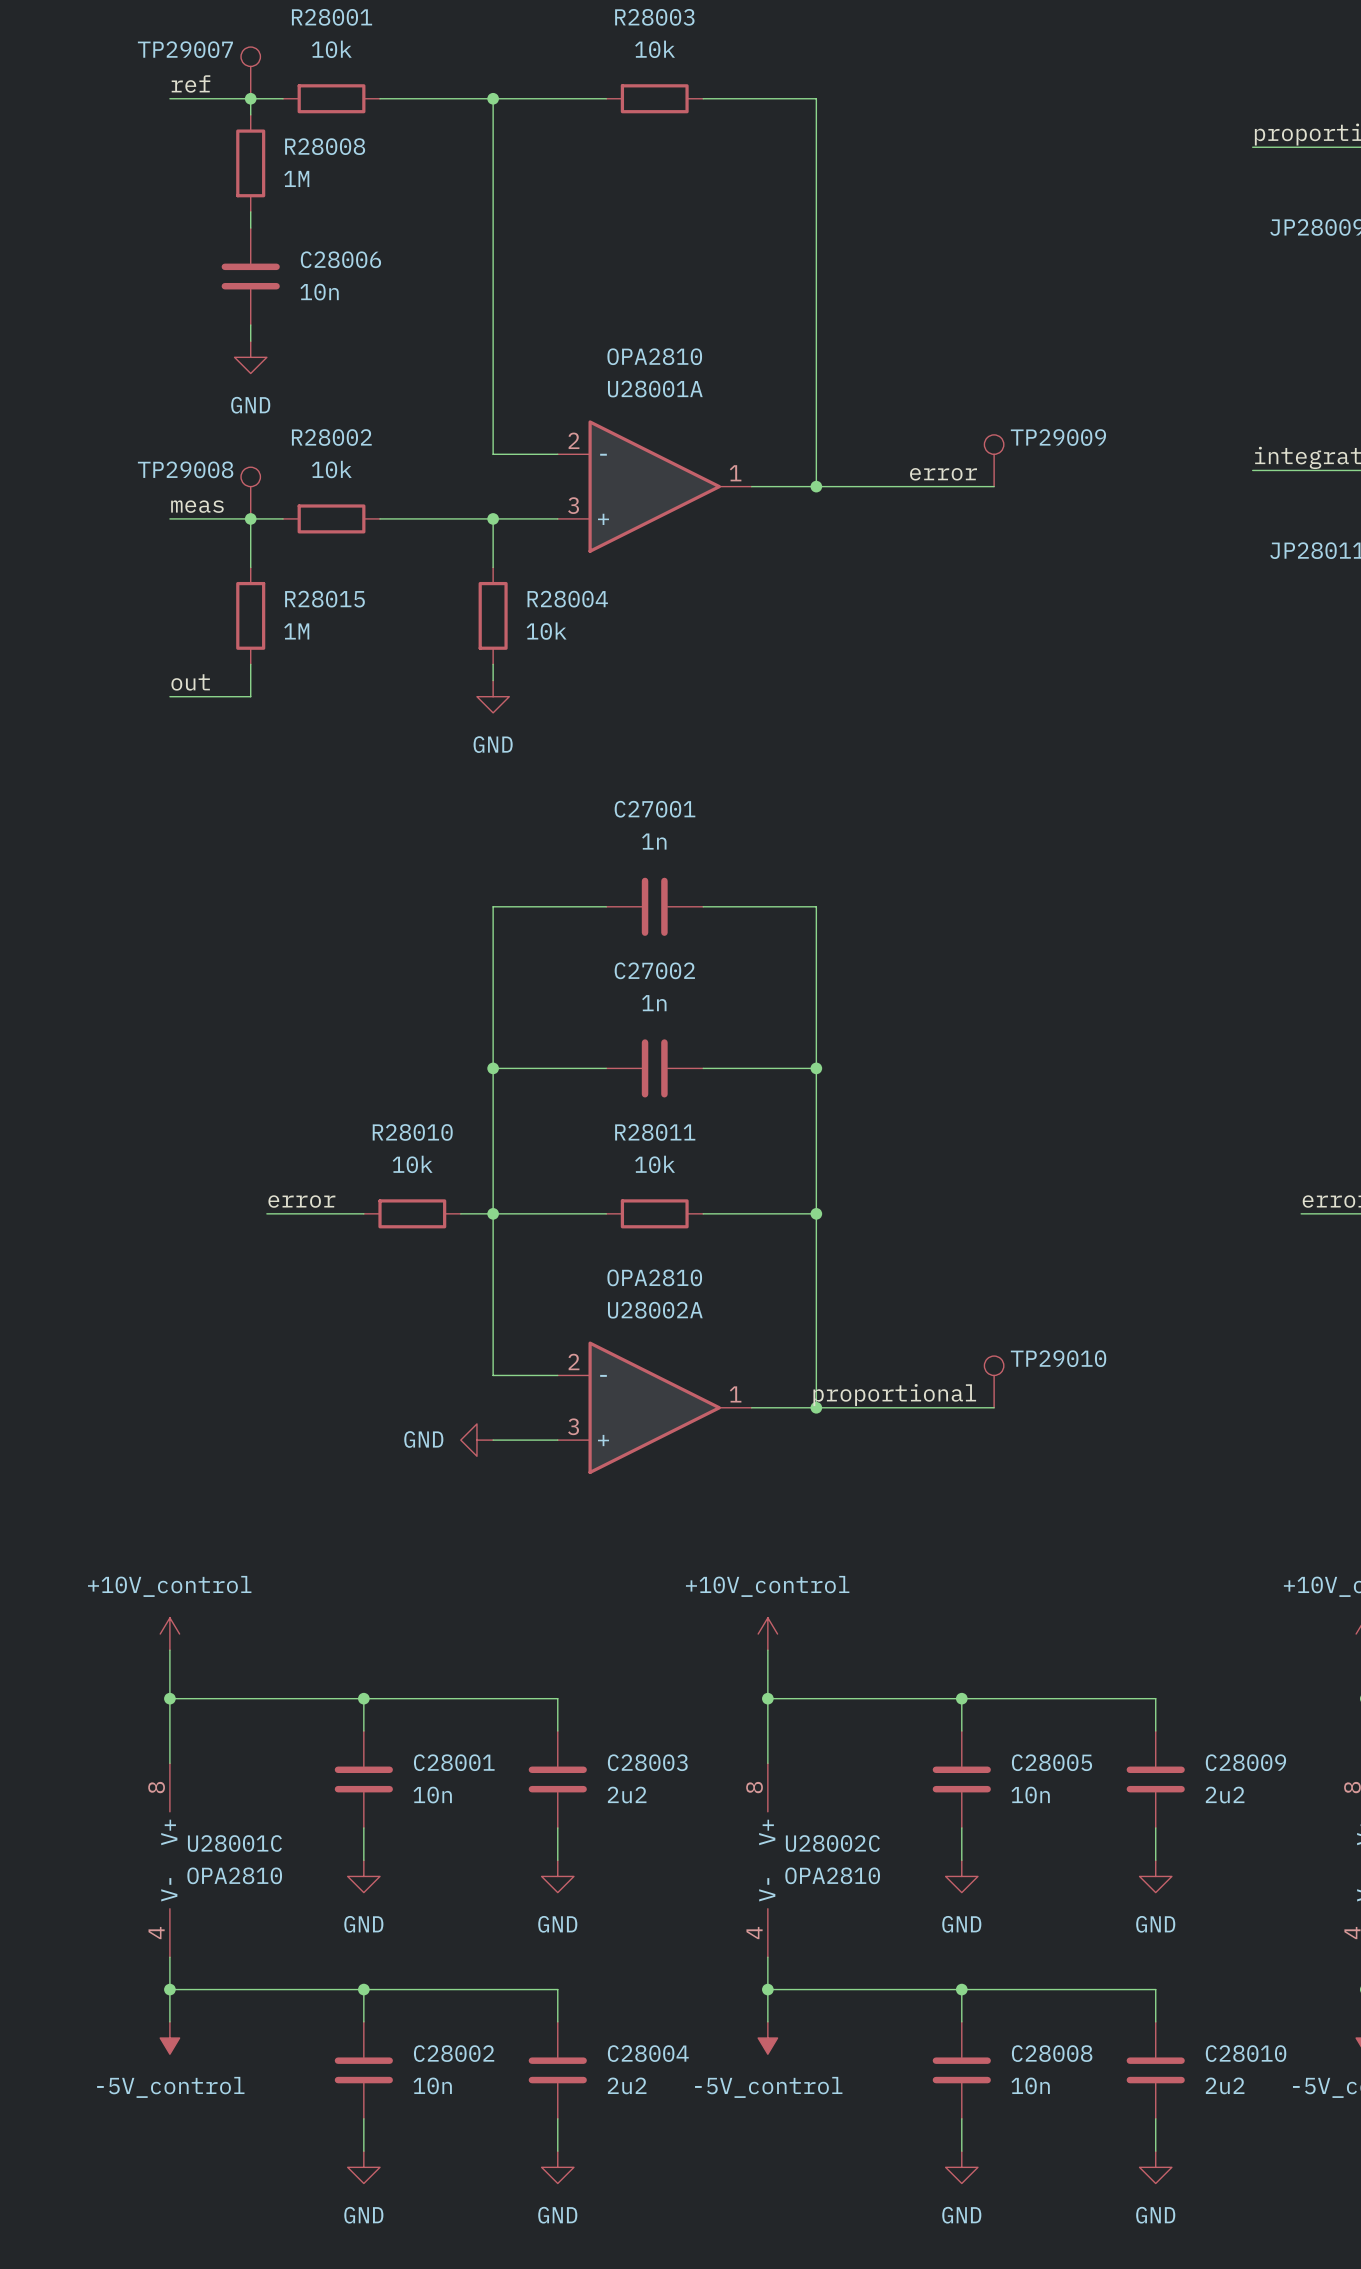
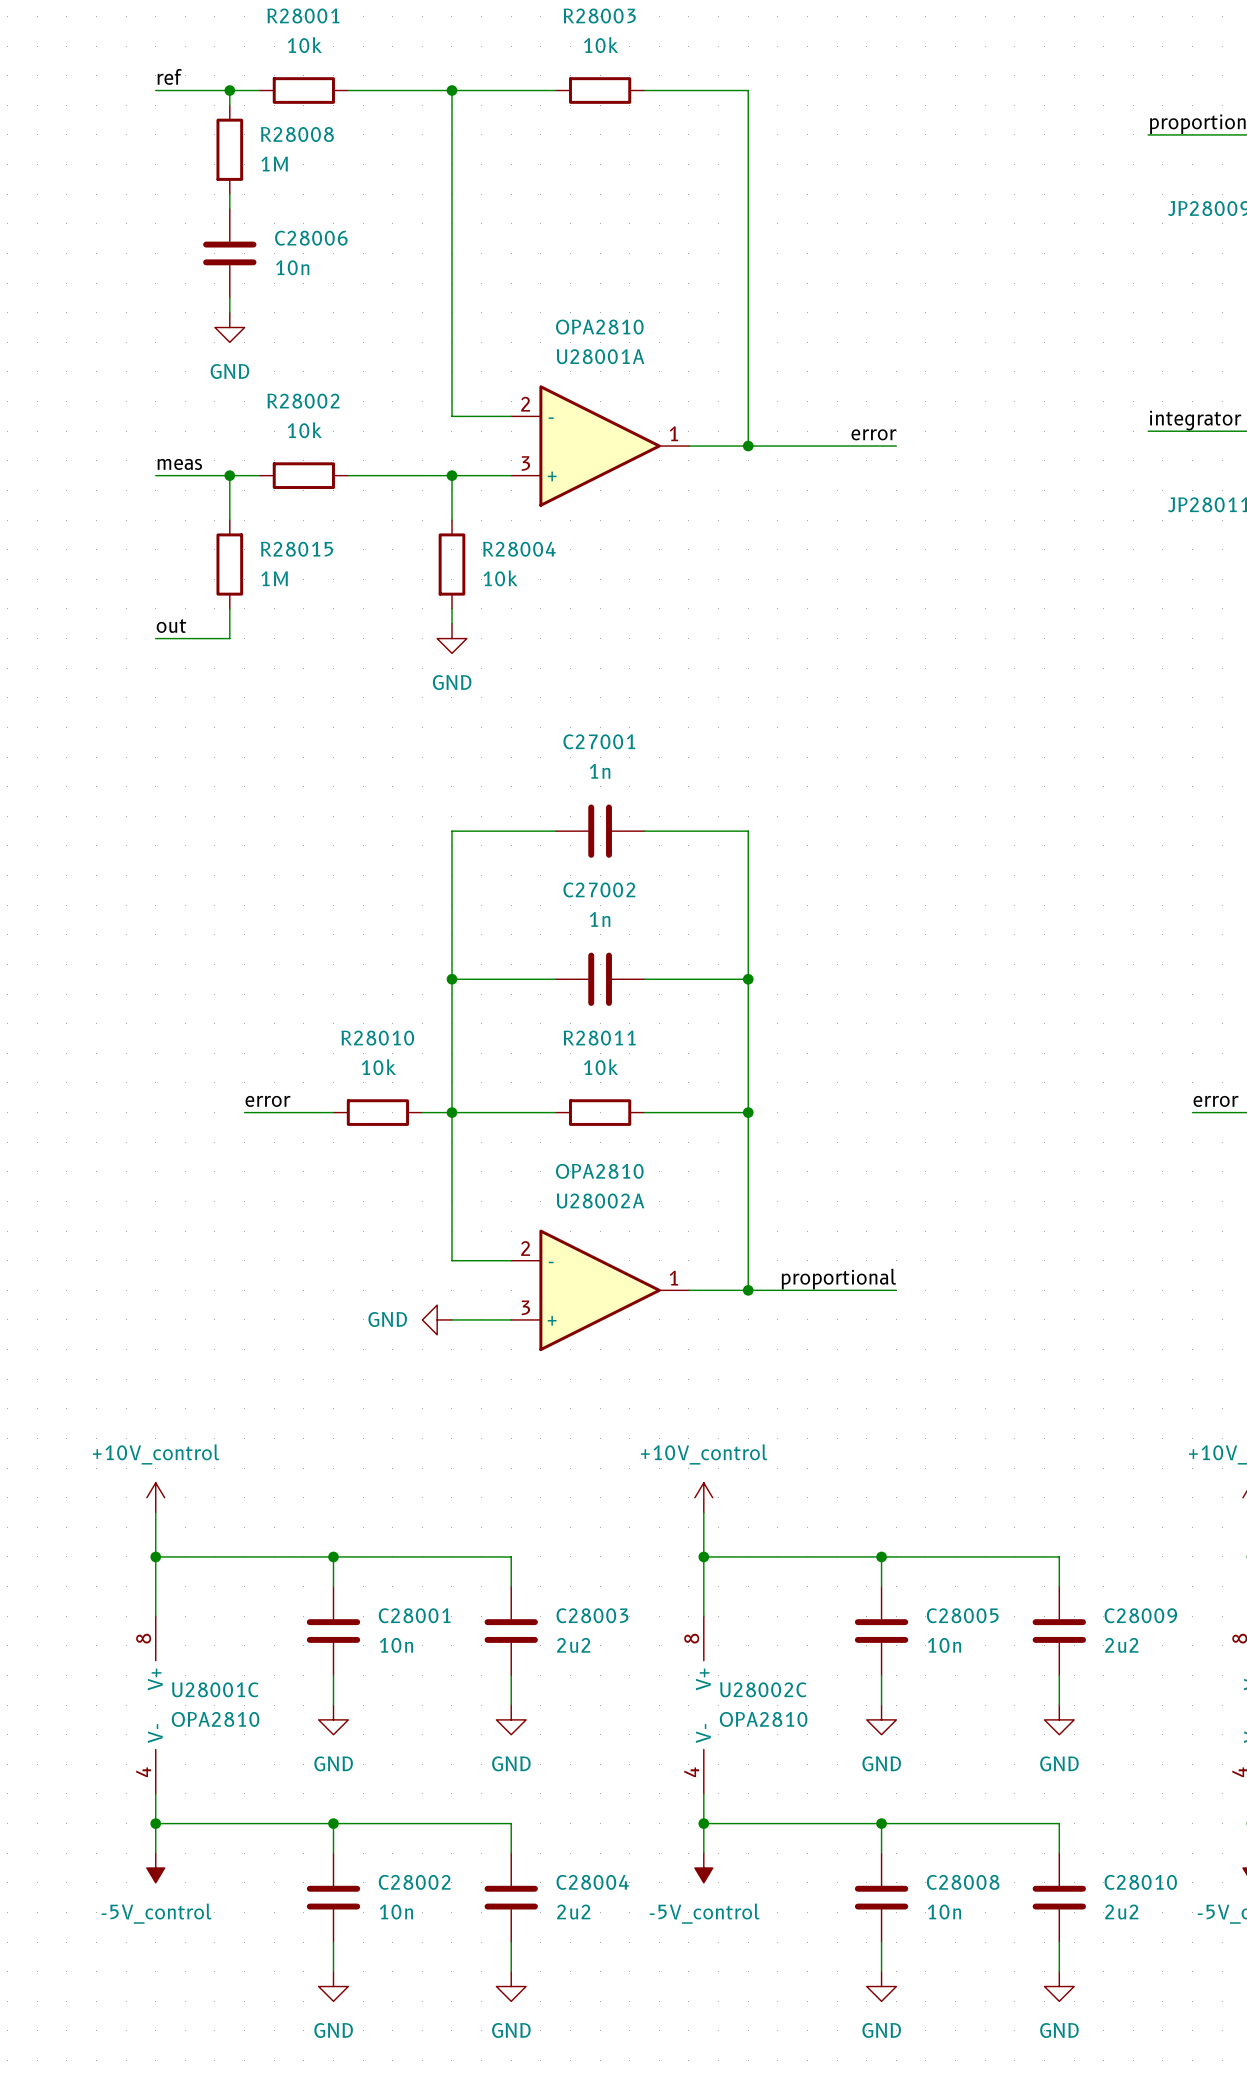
TP29007: (250, 72) -> none
TP29009: (994, 460) -> none
wire: (977, 486) (994, 486) -> none
TP29008: (250, 493) -> none
TP29010: (994, 1381) -> none
wire: (977, 1407) (994, 1407) -> none

